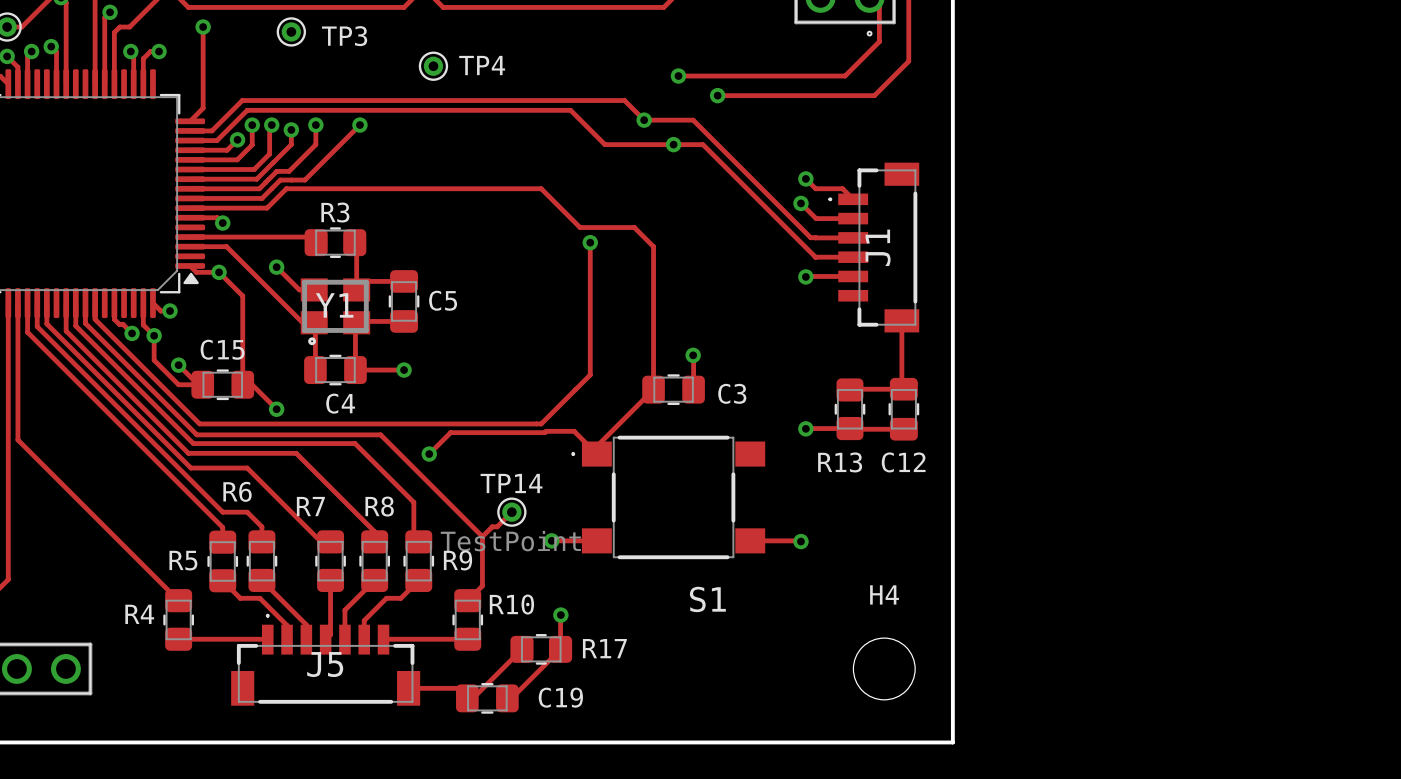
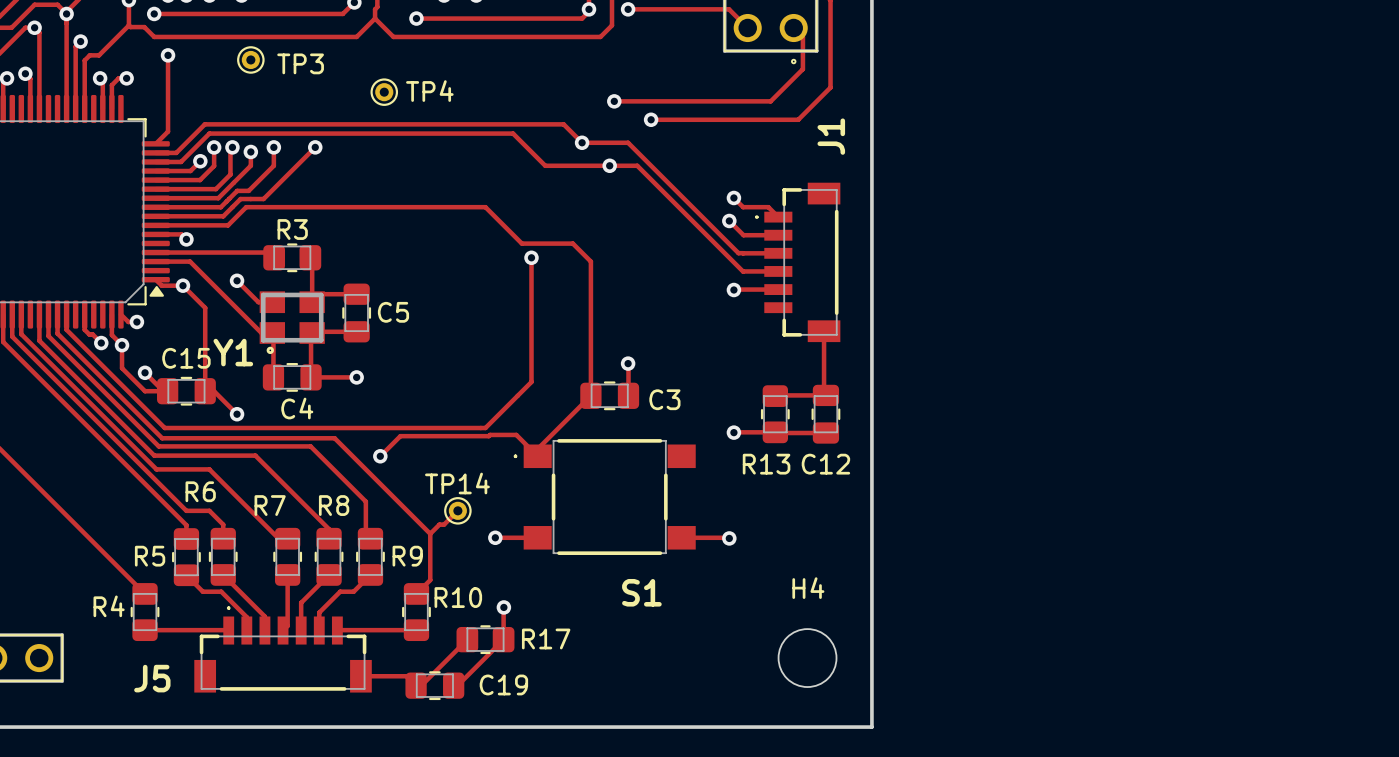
J1 name position: J1 (878, 247) -> J1 (831, 136)
Y1 name position: Y1 (334, 305) -> Y1 (233, 352)
TP14 value: TestPoint (510, 541) -> none
J5 name position: J5 (325, 664) -> J5 (152, 678)

